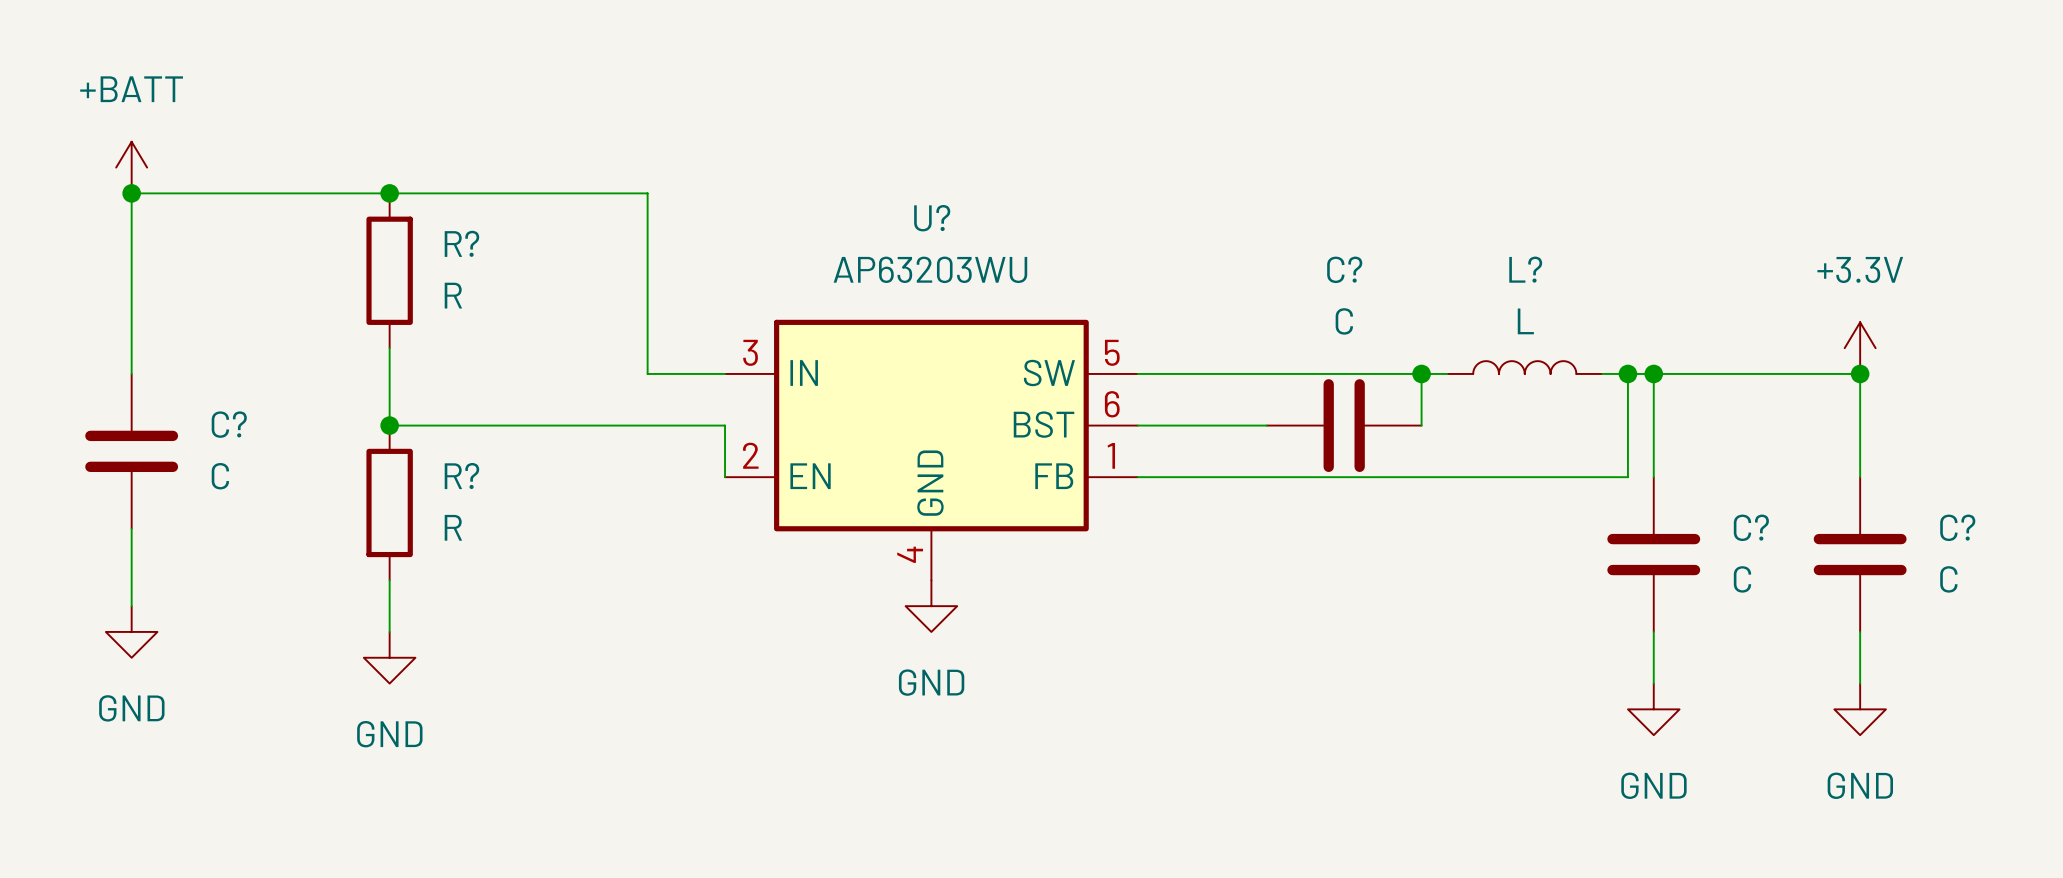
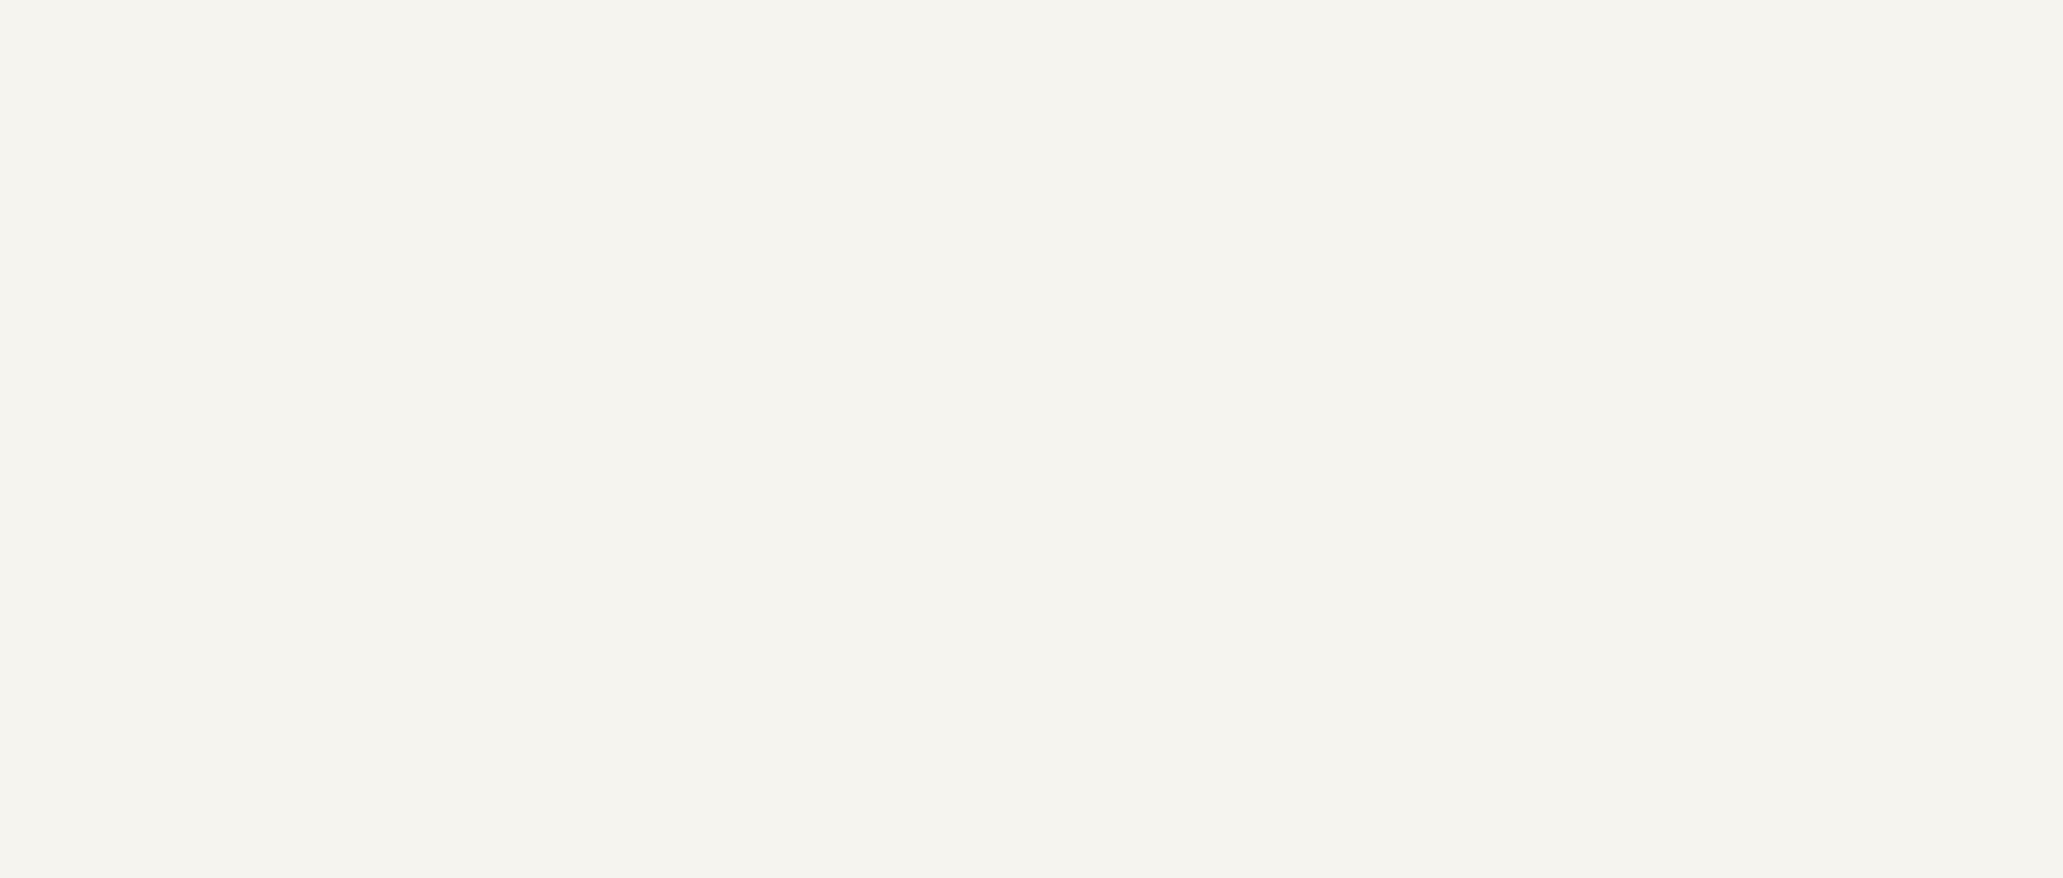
power symbol: +BATT (131, 167) -> none
junction: (131, 193) -> none
junction: (389, 193) -> none
R?: R (389, 270) -> none
wire: (389, 348) (389, 425) (725, 425) (725, 477) -> none
power symbol: +3.3V (1860, 348) -> none
L?: L (1524, 367) -> none
wire: (131, 373) (131, 193) (647, 193) (647, 373) (725, 373) -> none
wire: (1137, 373) (1447, 373) -> none
wire: (1421, 373) (1421, 425) -> none
junction: (1421, 373) -> none
wire: (1602, 373) (1860, 373) (1860, 477) -> none
wire: (1627, 373) (1627, 477) (1137, 477) -> none
junction: (1627, 373) -> none
wire: (1653, 373) (1653, 477) -> none
junction: (1653, 373) -> none
junction: (1860, 373) -> none
junction: (389, 425) -> none
wire: (1137, 425) (1266, 425) -> none
C?: C (1344, 425) -> none
U?: AP63203WU (931, 450) -> none
C?: C (131, 451) -> none
R?: R (389, 502) -> none
wire: (131, 528) (131, 606) -> none
C?: C (1653, 554) -> none
C?: C (1860, 554) -> none
wire: (389, 580) (389, 631) -> none
power symbol: GND (931, 606) -> none
power symbol: GND (131, 631) -> none
wire: (1653, 631) (1653, 683) -> none
wire: (1860, 631) (1860, 683) -> none
power symbol: GND (389, 657) -> none
power symbol: GND (1653, 709) -> none
power symbol: GND (1860, 709) -> none

